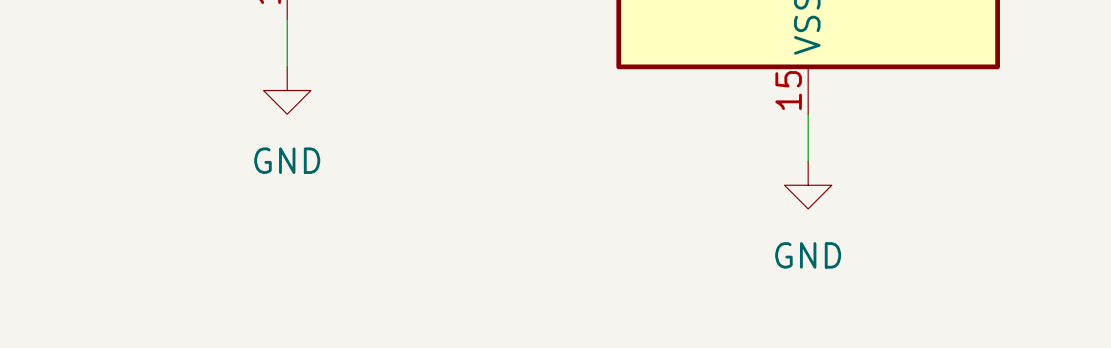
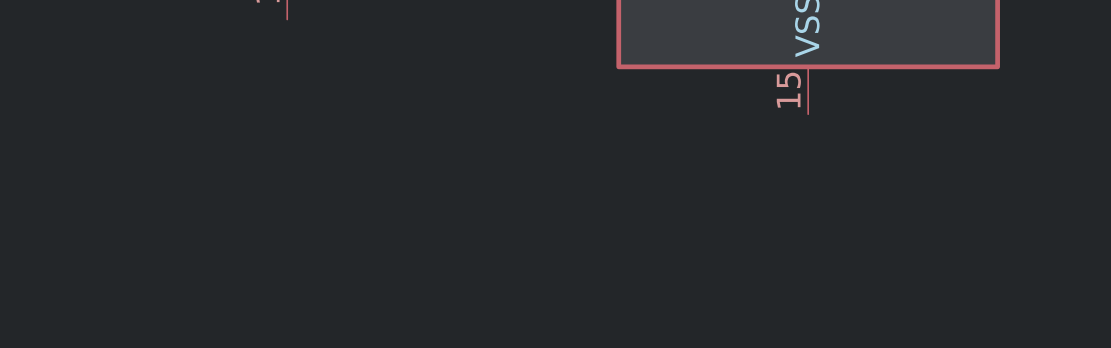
wire: (287, 19) (287, 66) -> none
power symbol: GND (287, 90) -> none
wire: (808, 114) (808, 161) -> none
power symbol: GND (808, 185) -> none

